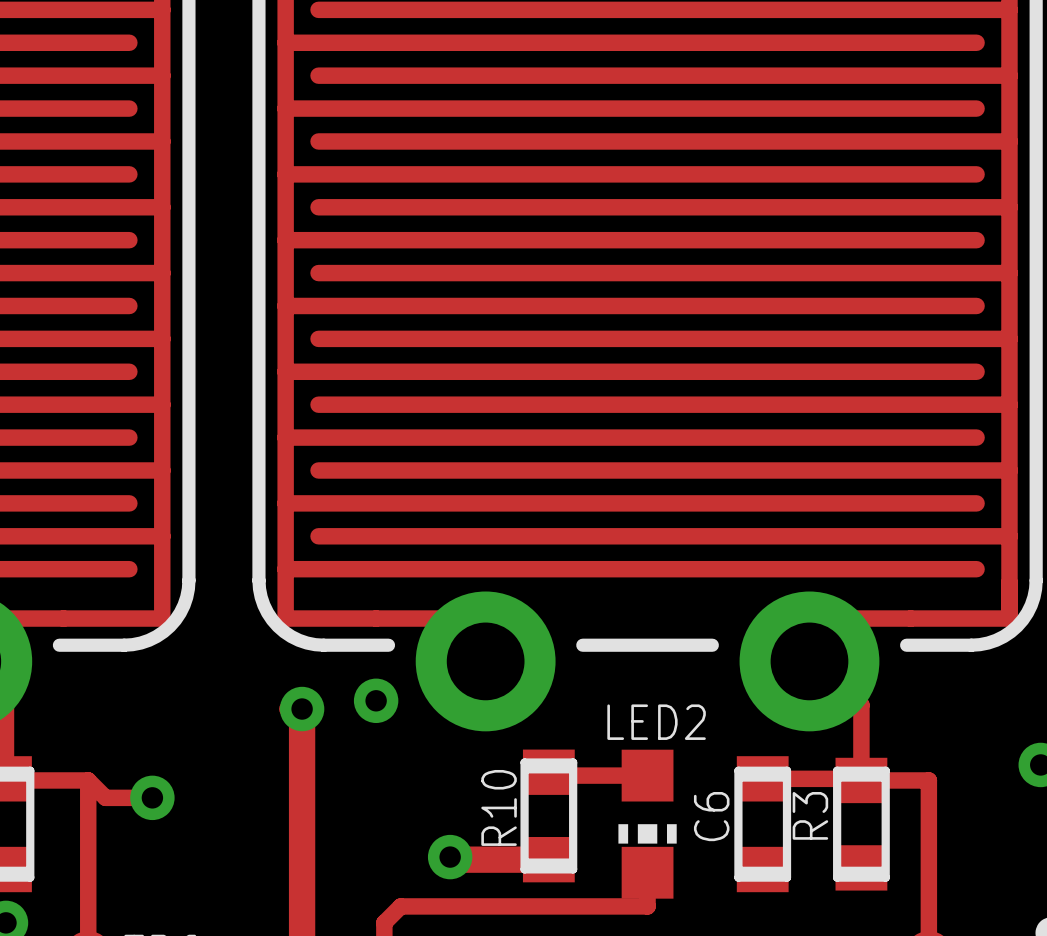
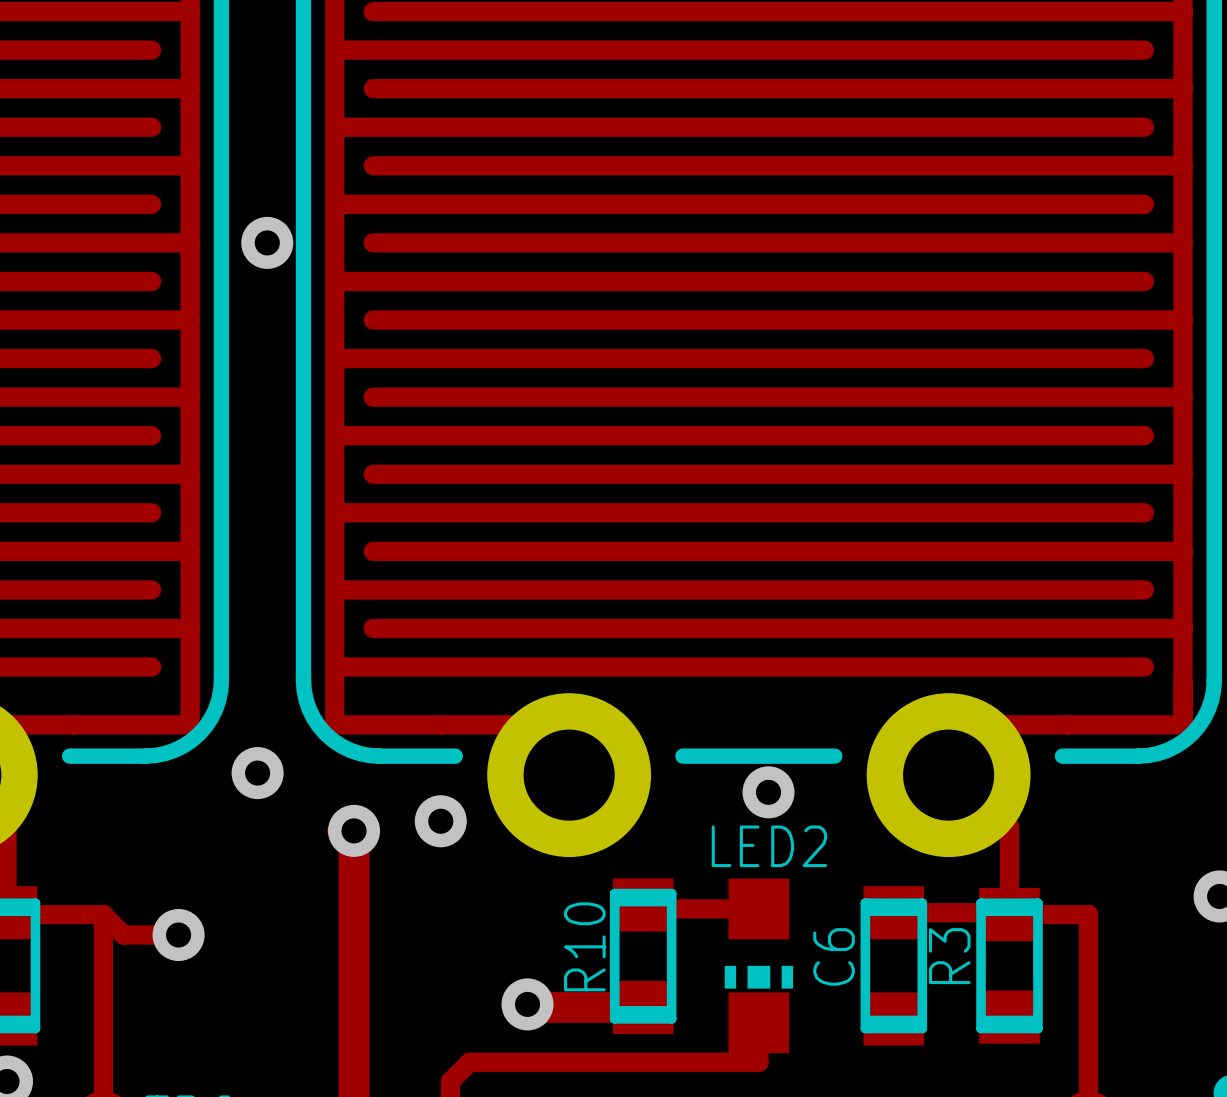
via: none -> (267, 242)
via: none -> (257, 773)
via: none -> (768, 792)

